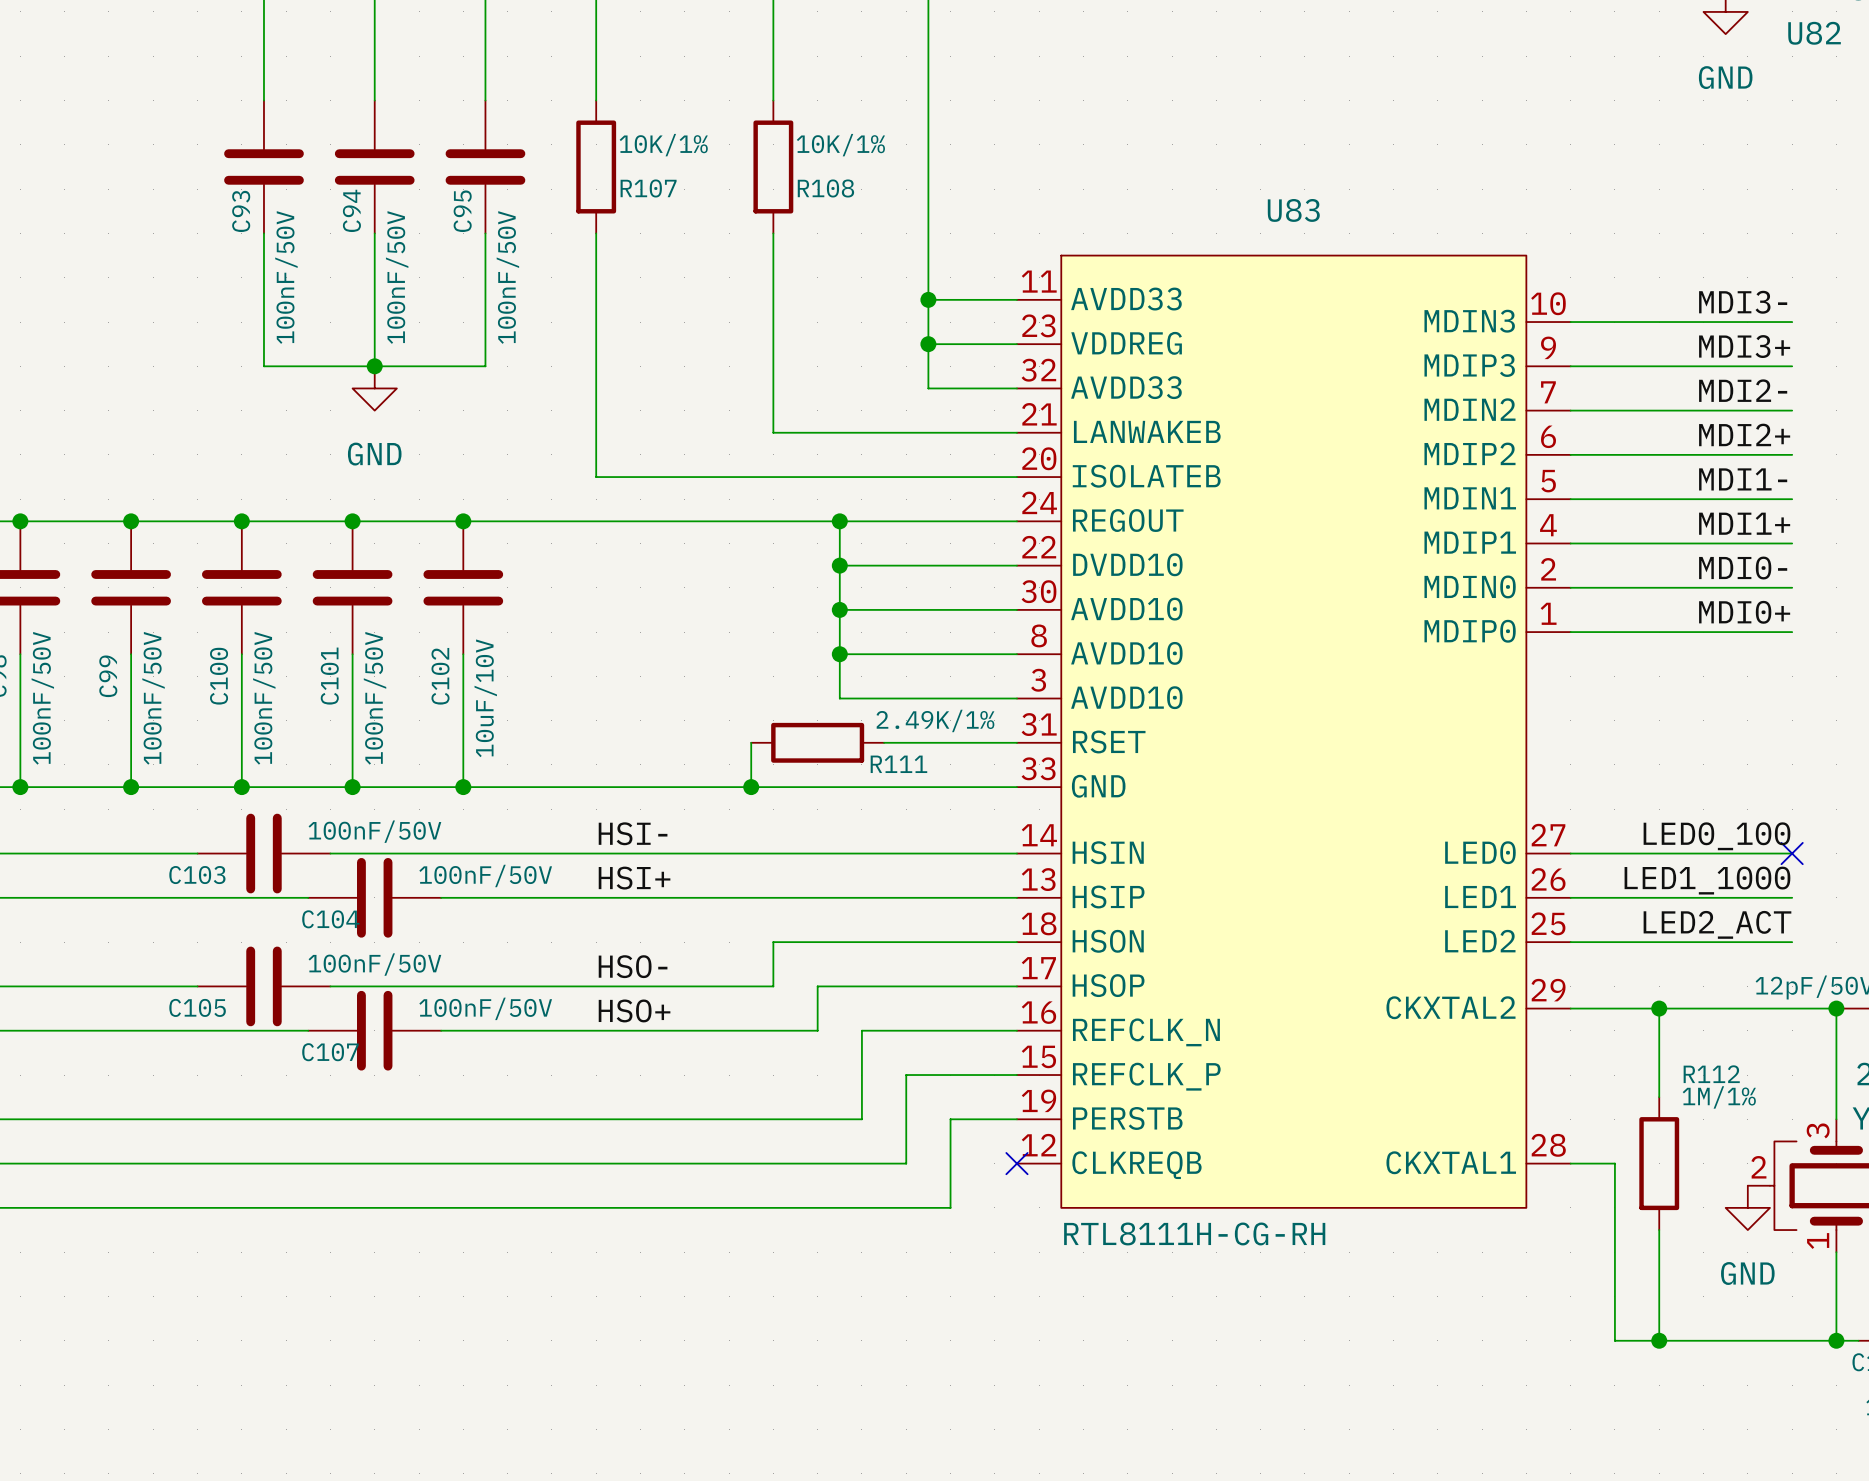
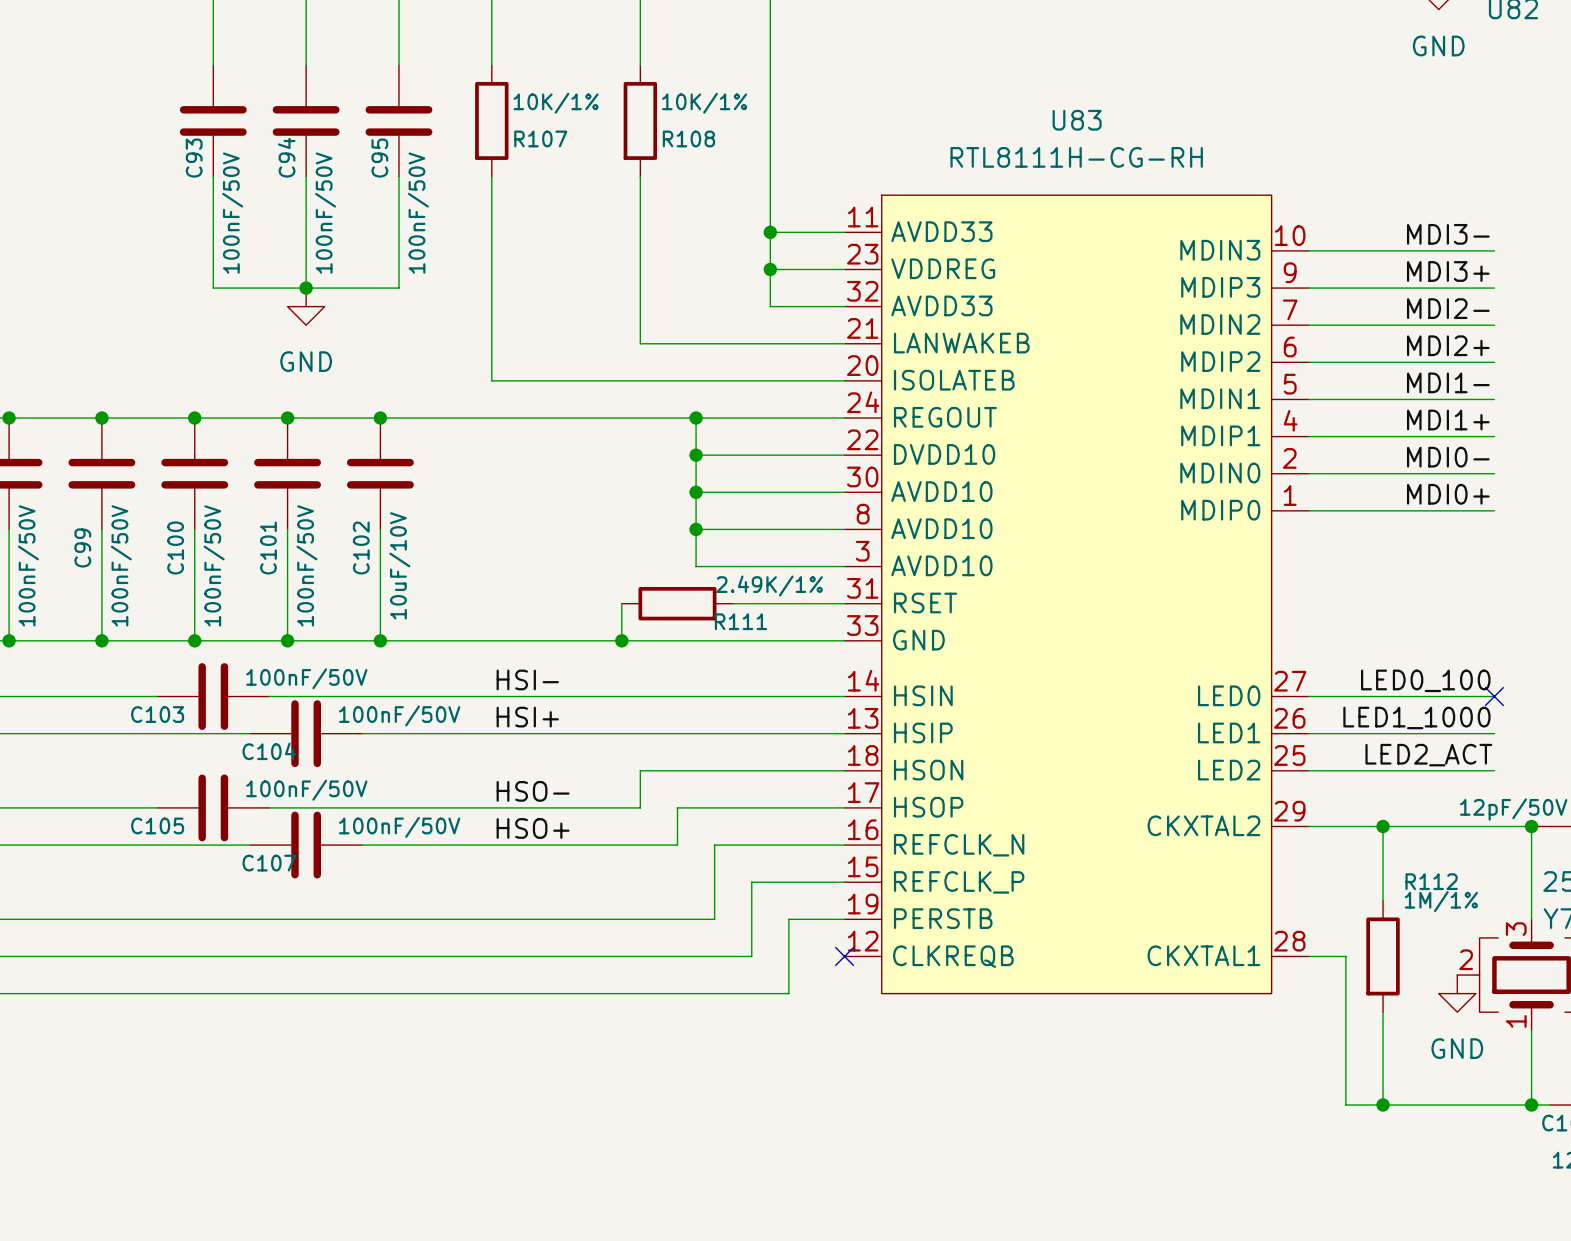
U83 name position: U83 (1293, 210) -> U83 (1077, 120)
U83 value position: RTL8111H-CG-RH (1194, 1233) -> RTL8111H-CG-RH (1076, 157)

